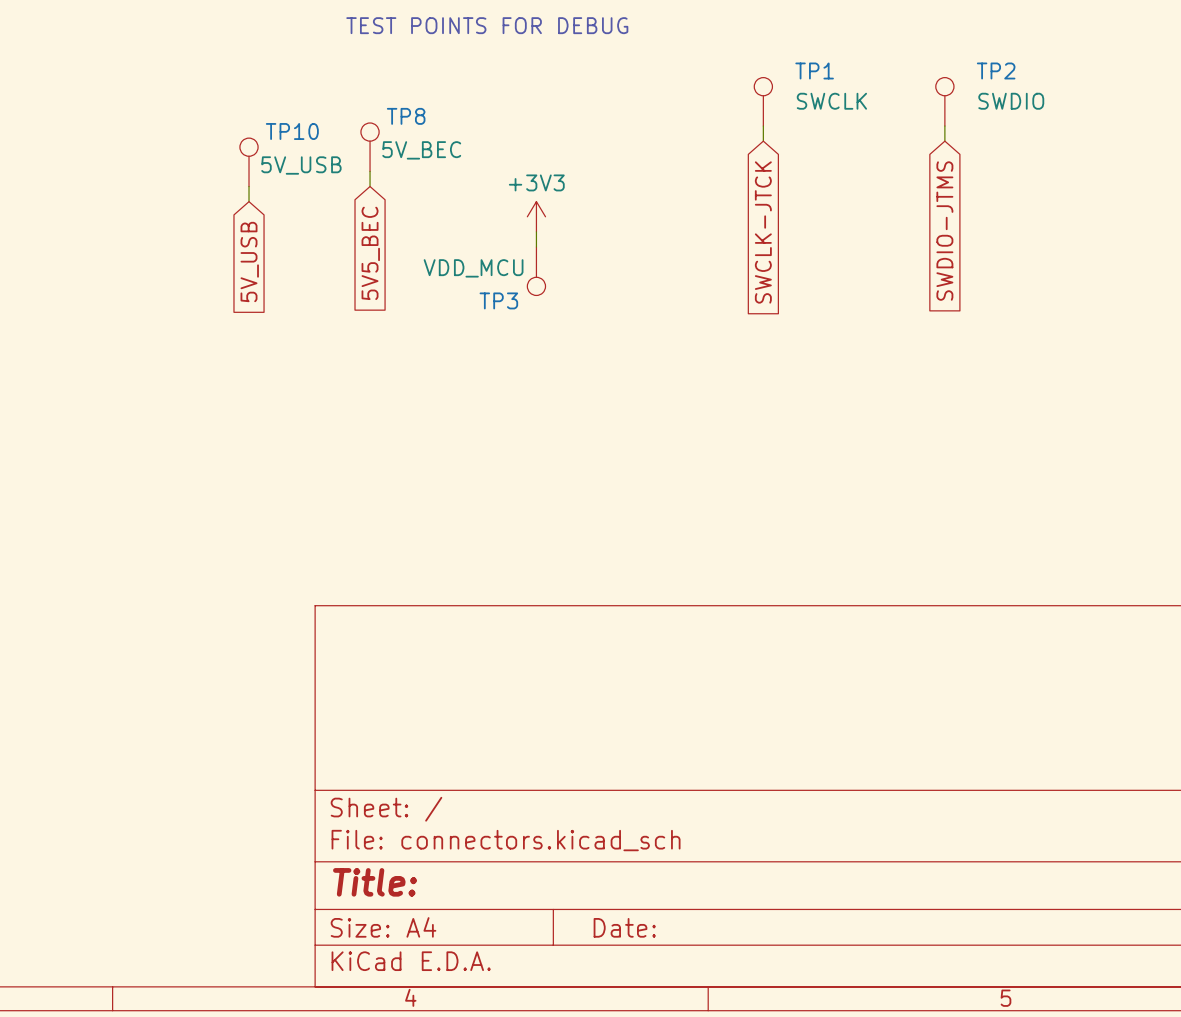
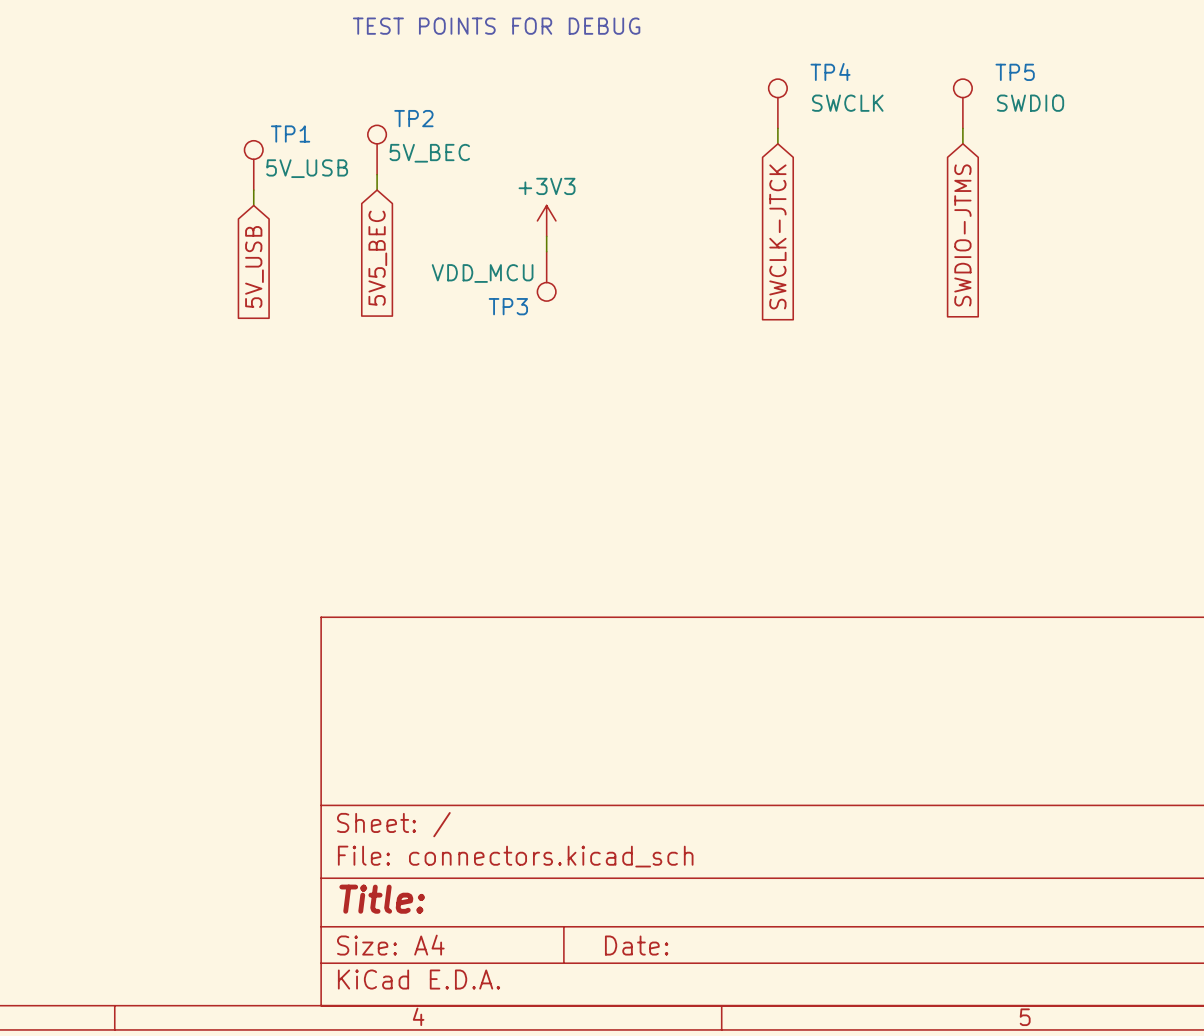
TP1 name: TP1 (814, 70) -> TP4 (830, 71)
TP2 name: TP2 (996, 70) -> TP5 (1015, 72)
TP8 name: TP8 (406, 116) -> TP2 (413, 118)
TP10 name: TP10 (292, 131) -> TP1 (290, 134)

